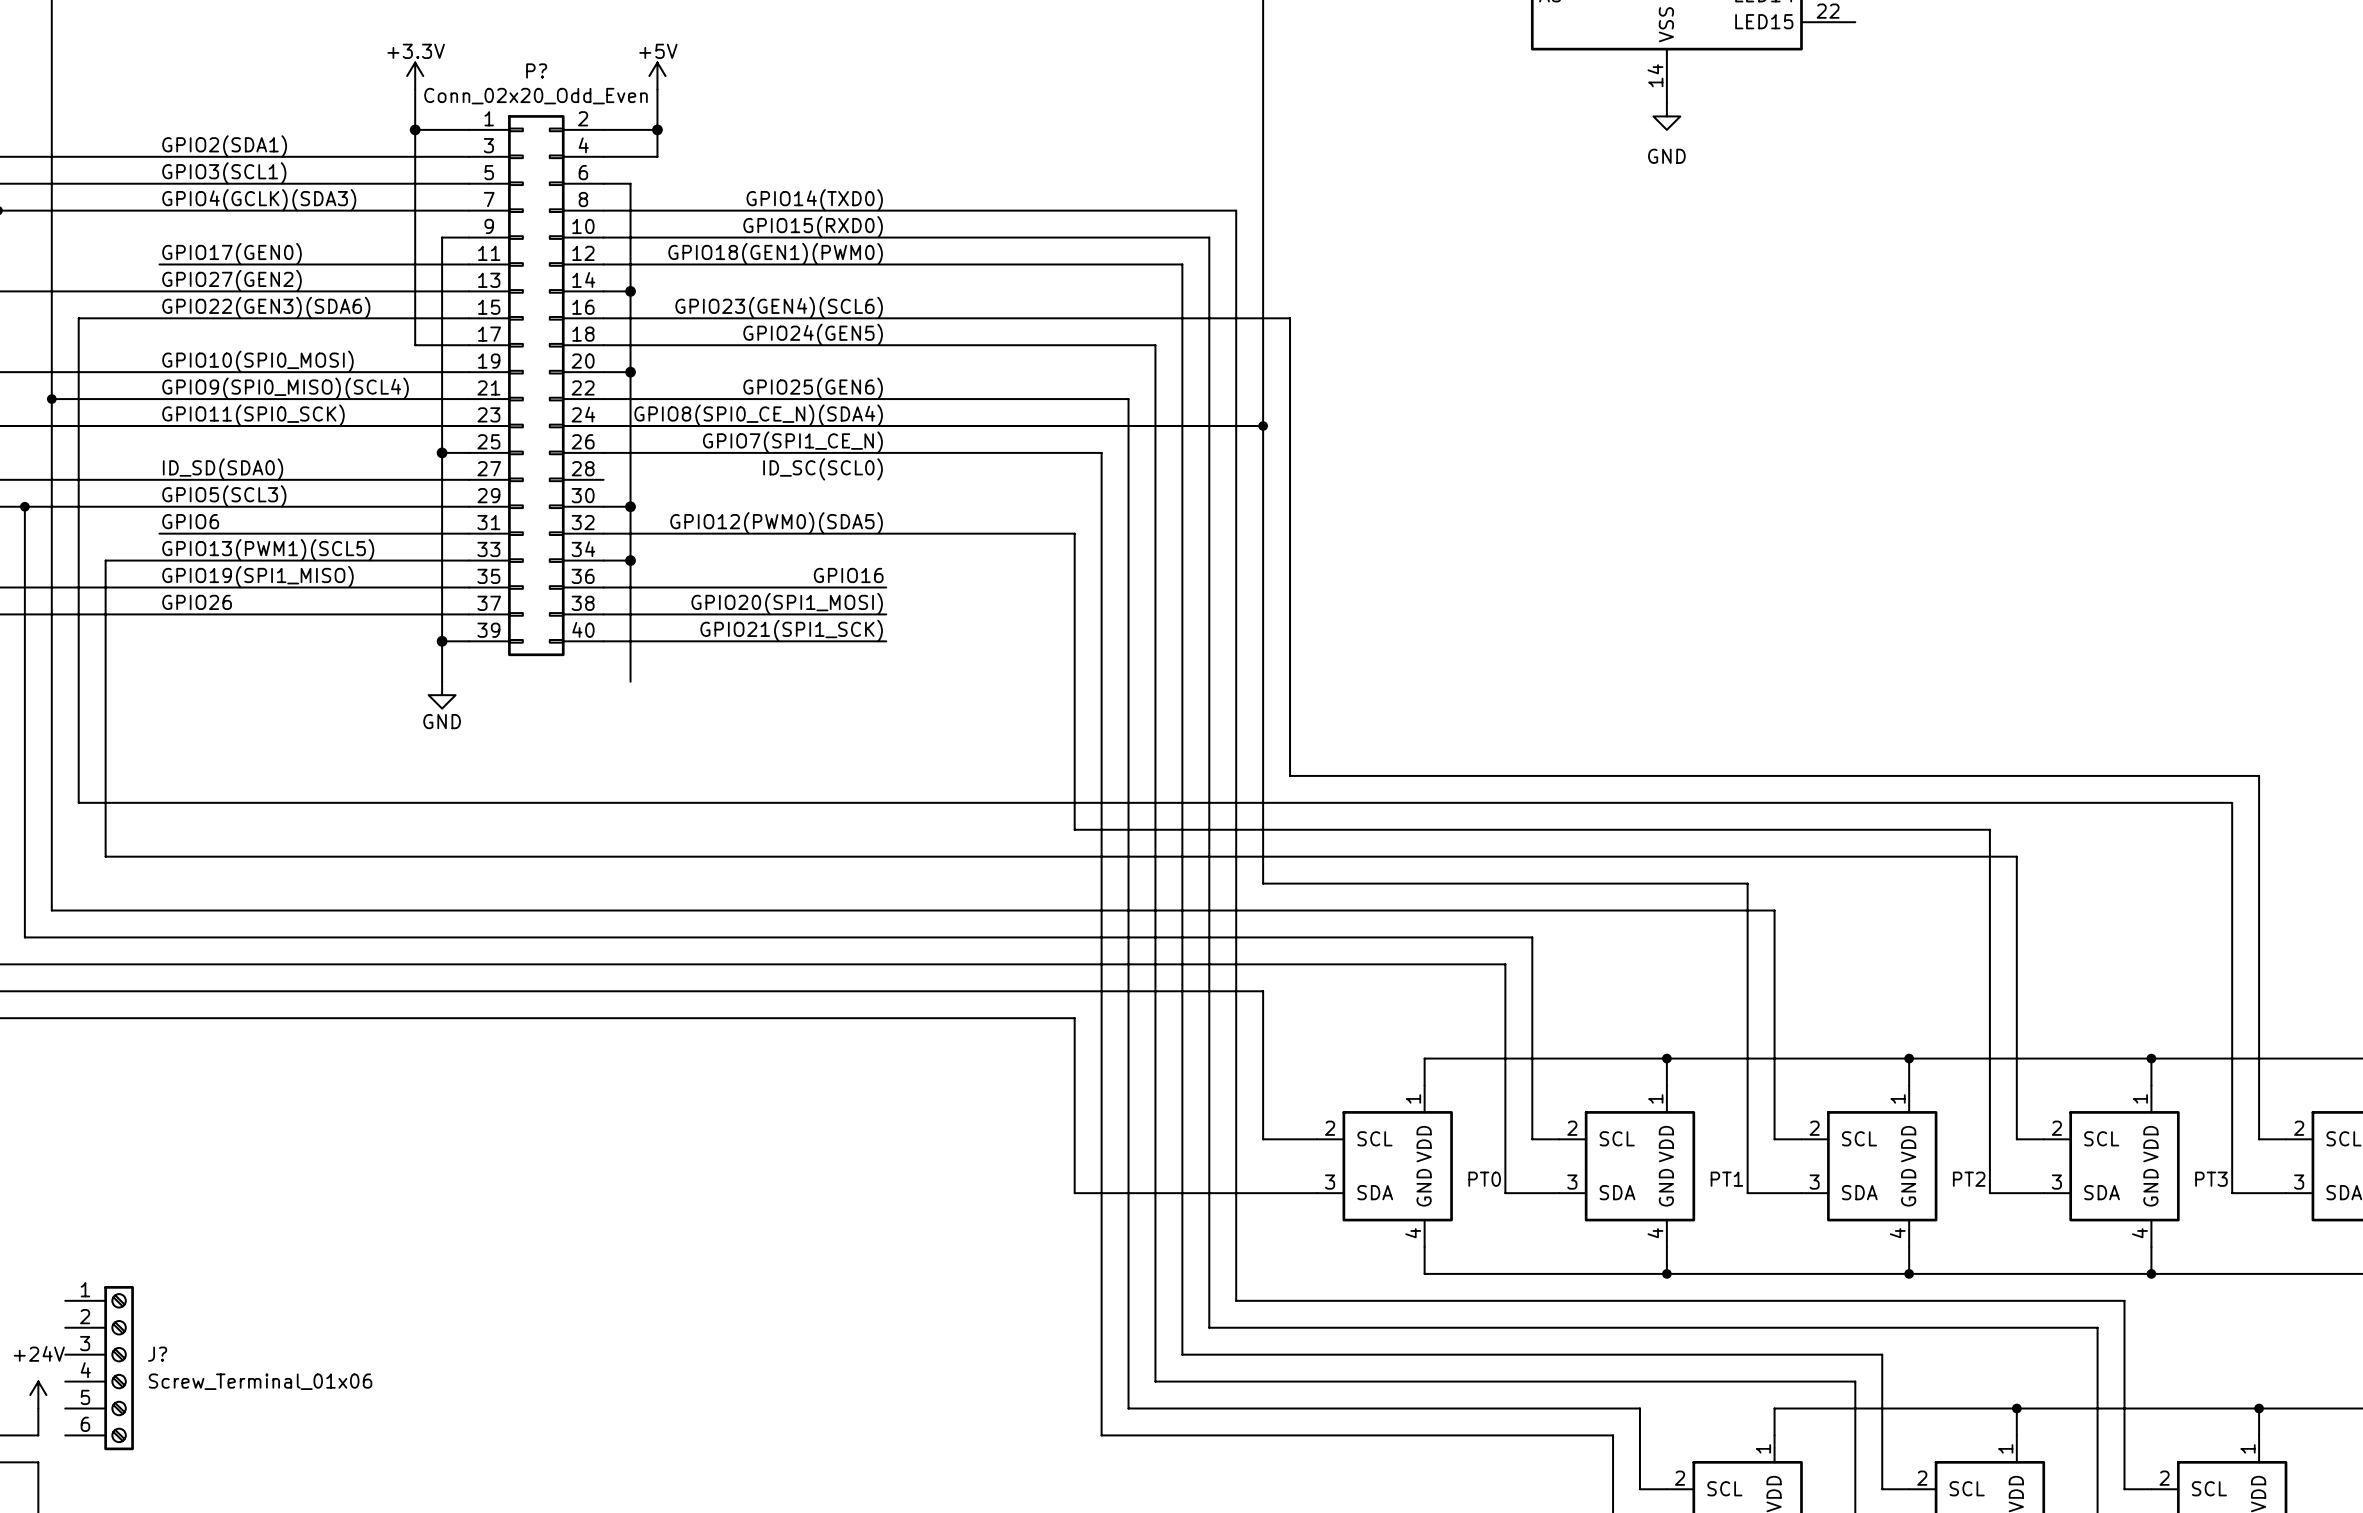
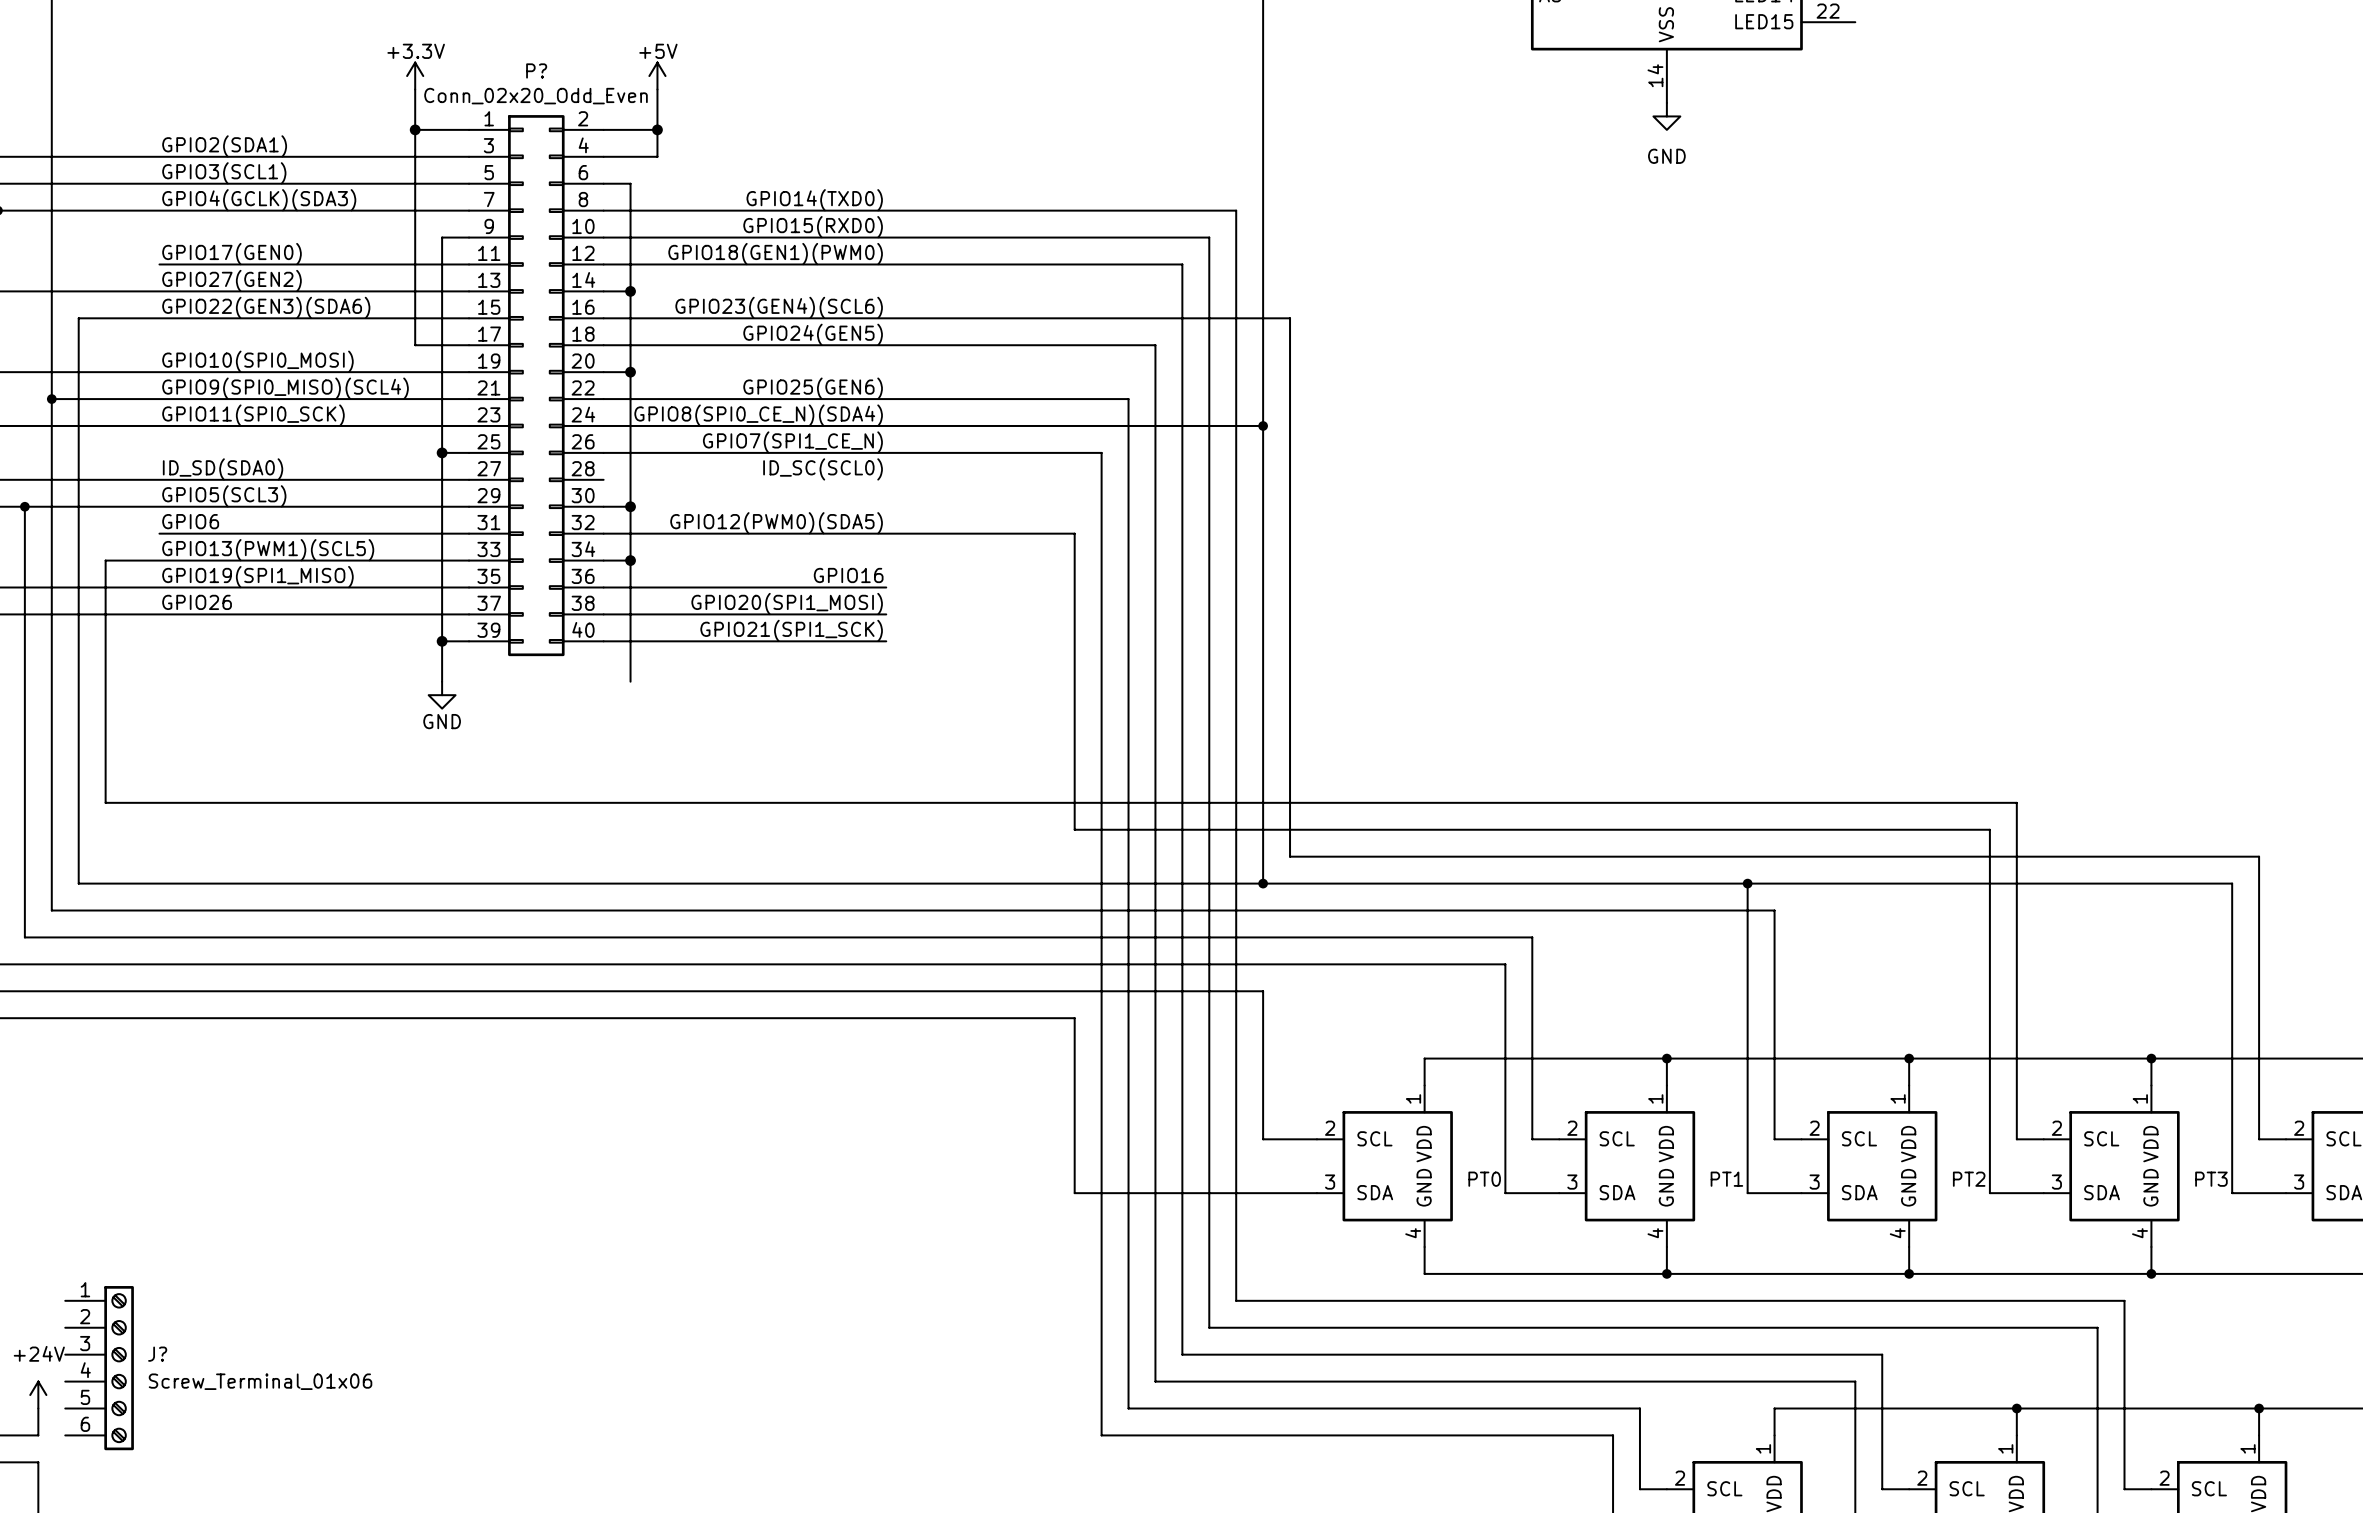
wire: (1290, 775) (2259, 775) (2259, 856) -> (1290, 775) (1290, 856)
wire: (78, 802) (105, 802) (105, 856) (1290, 856) -> (78, 802) (78, 883) (1263, 883)
wire: (2016, 802) (2232, 802) (2232, 883) -> (2016, 802) (2016, 856) (2259, 856)
junction: none -> (1263, 883)
wire: none -> (1747, 883) (2232, 883)
junction: none -> (1747, 883)

